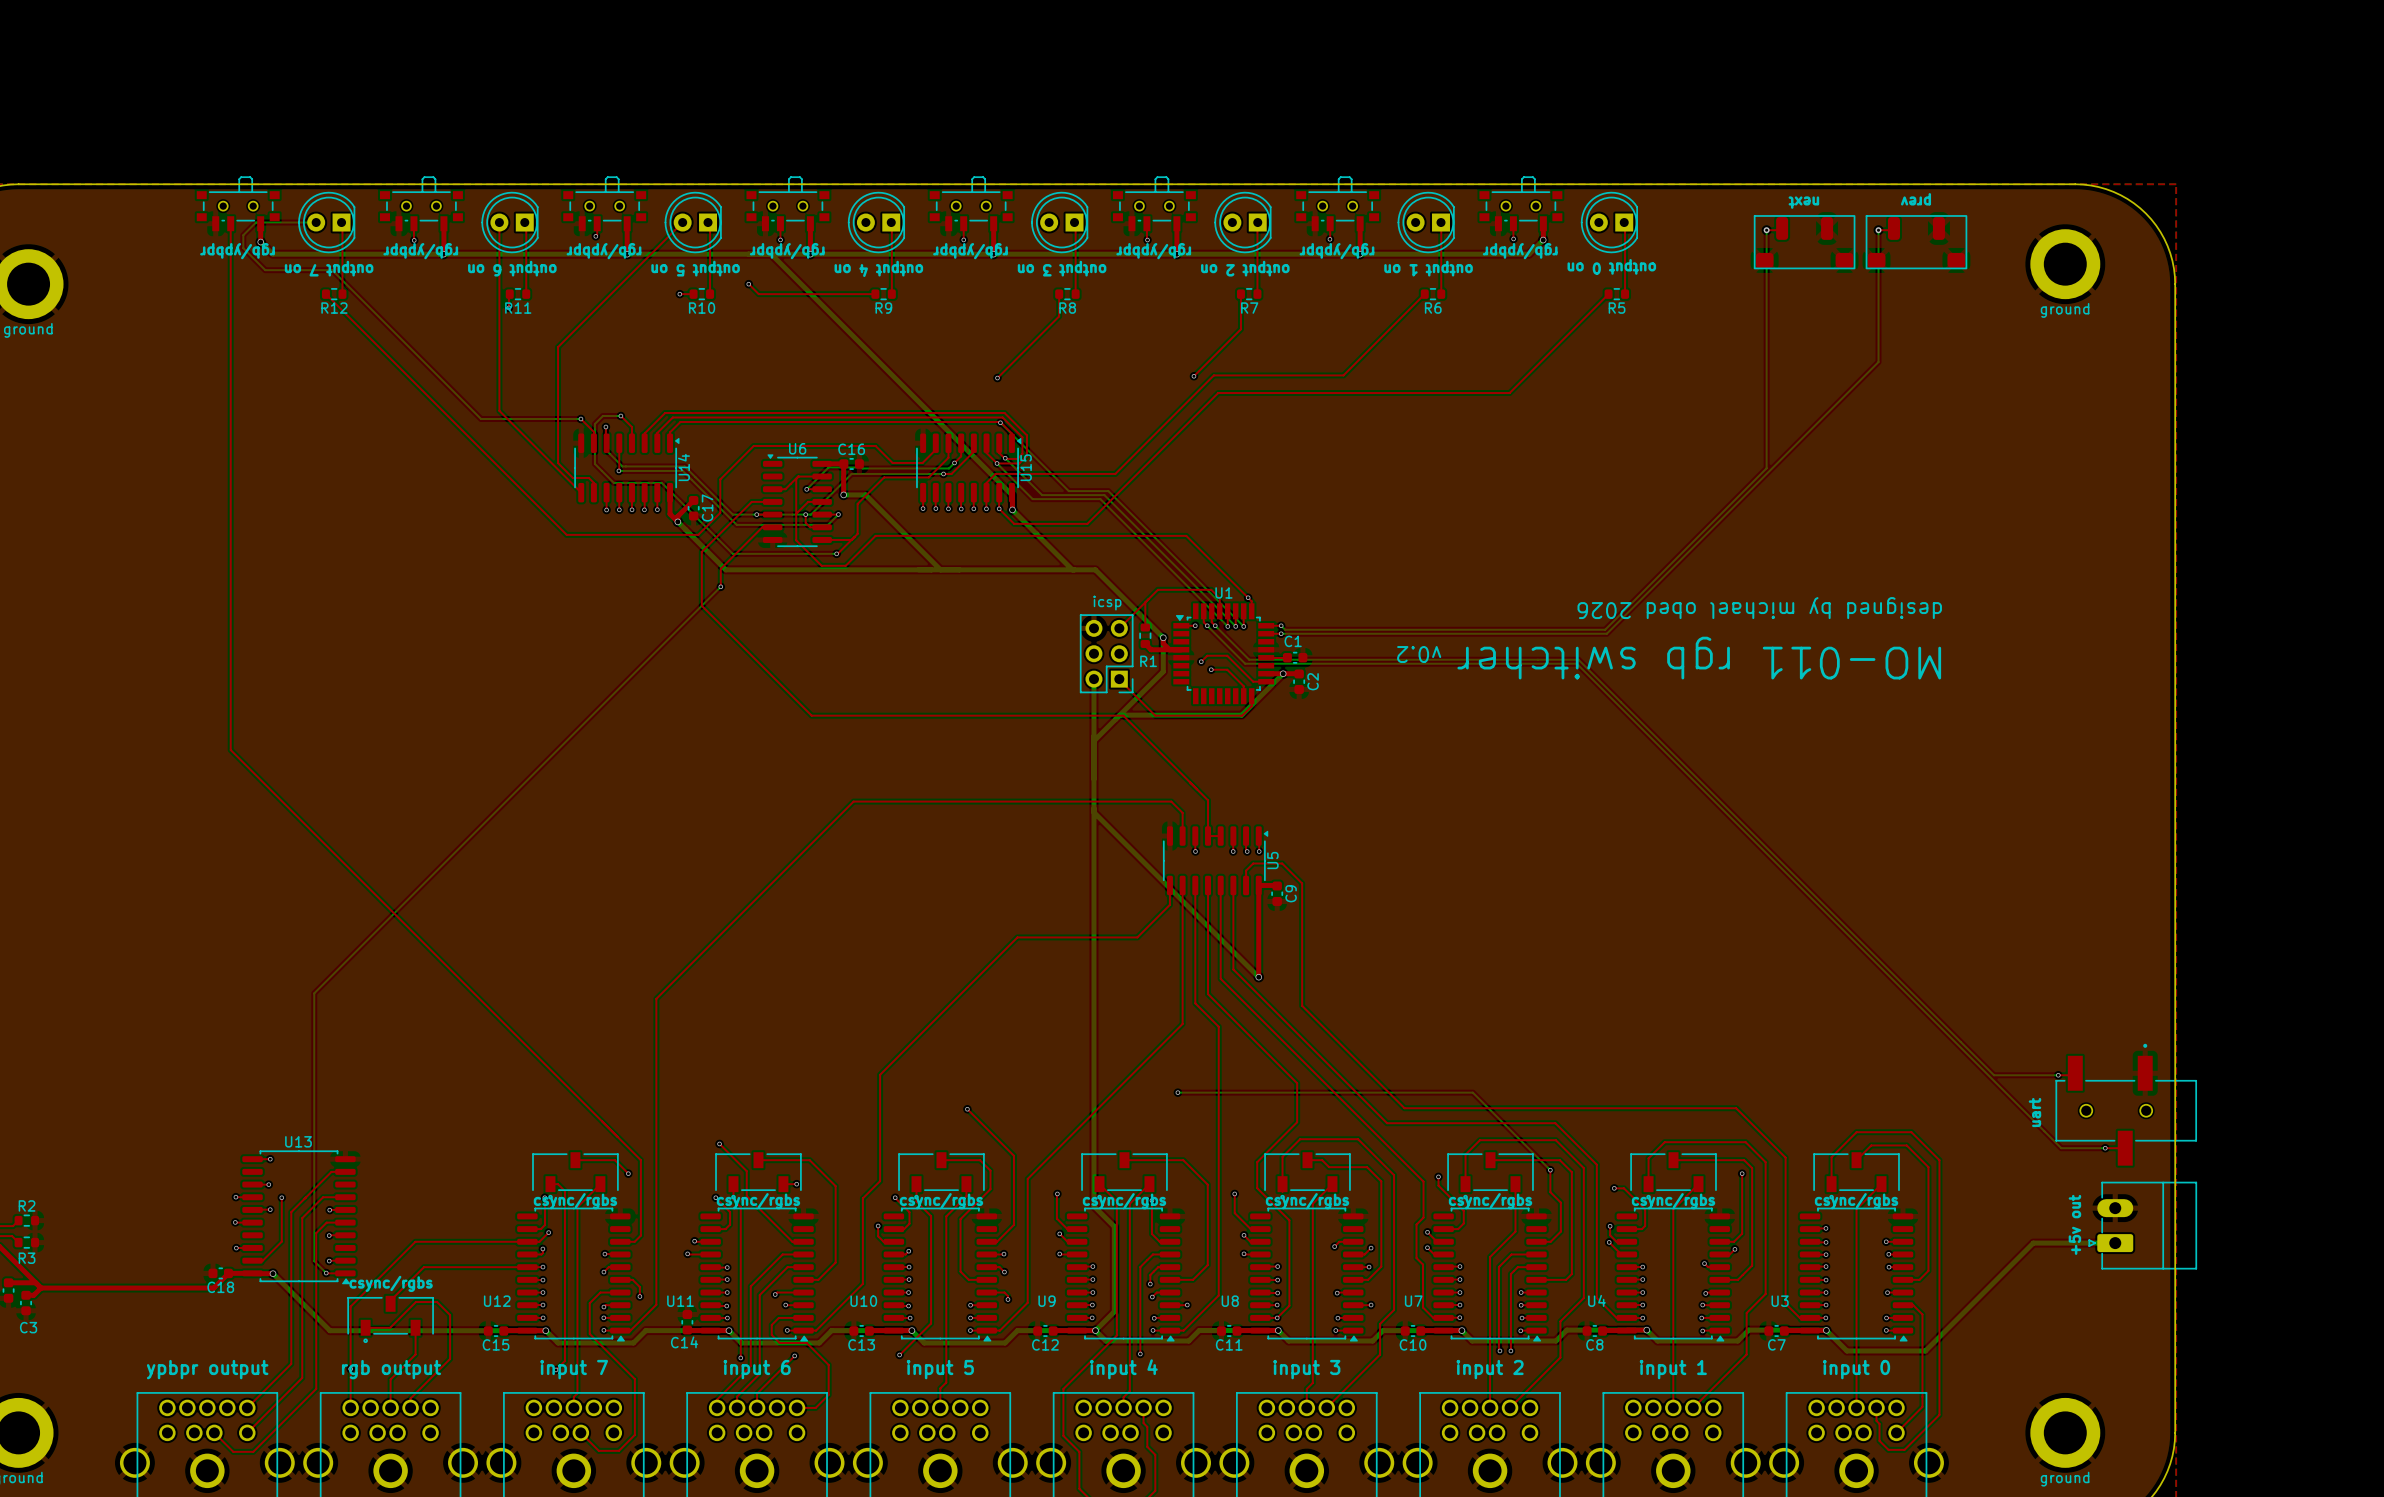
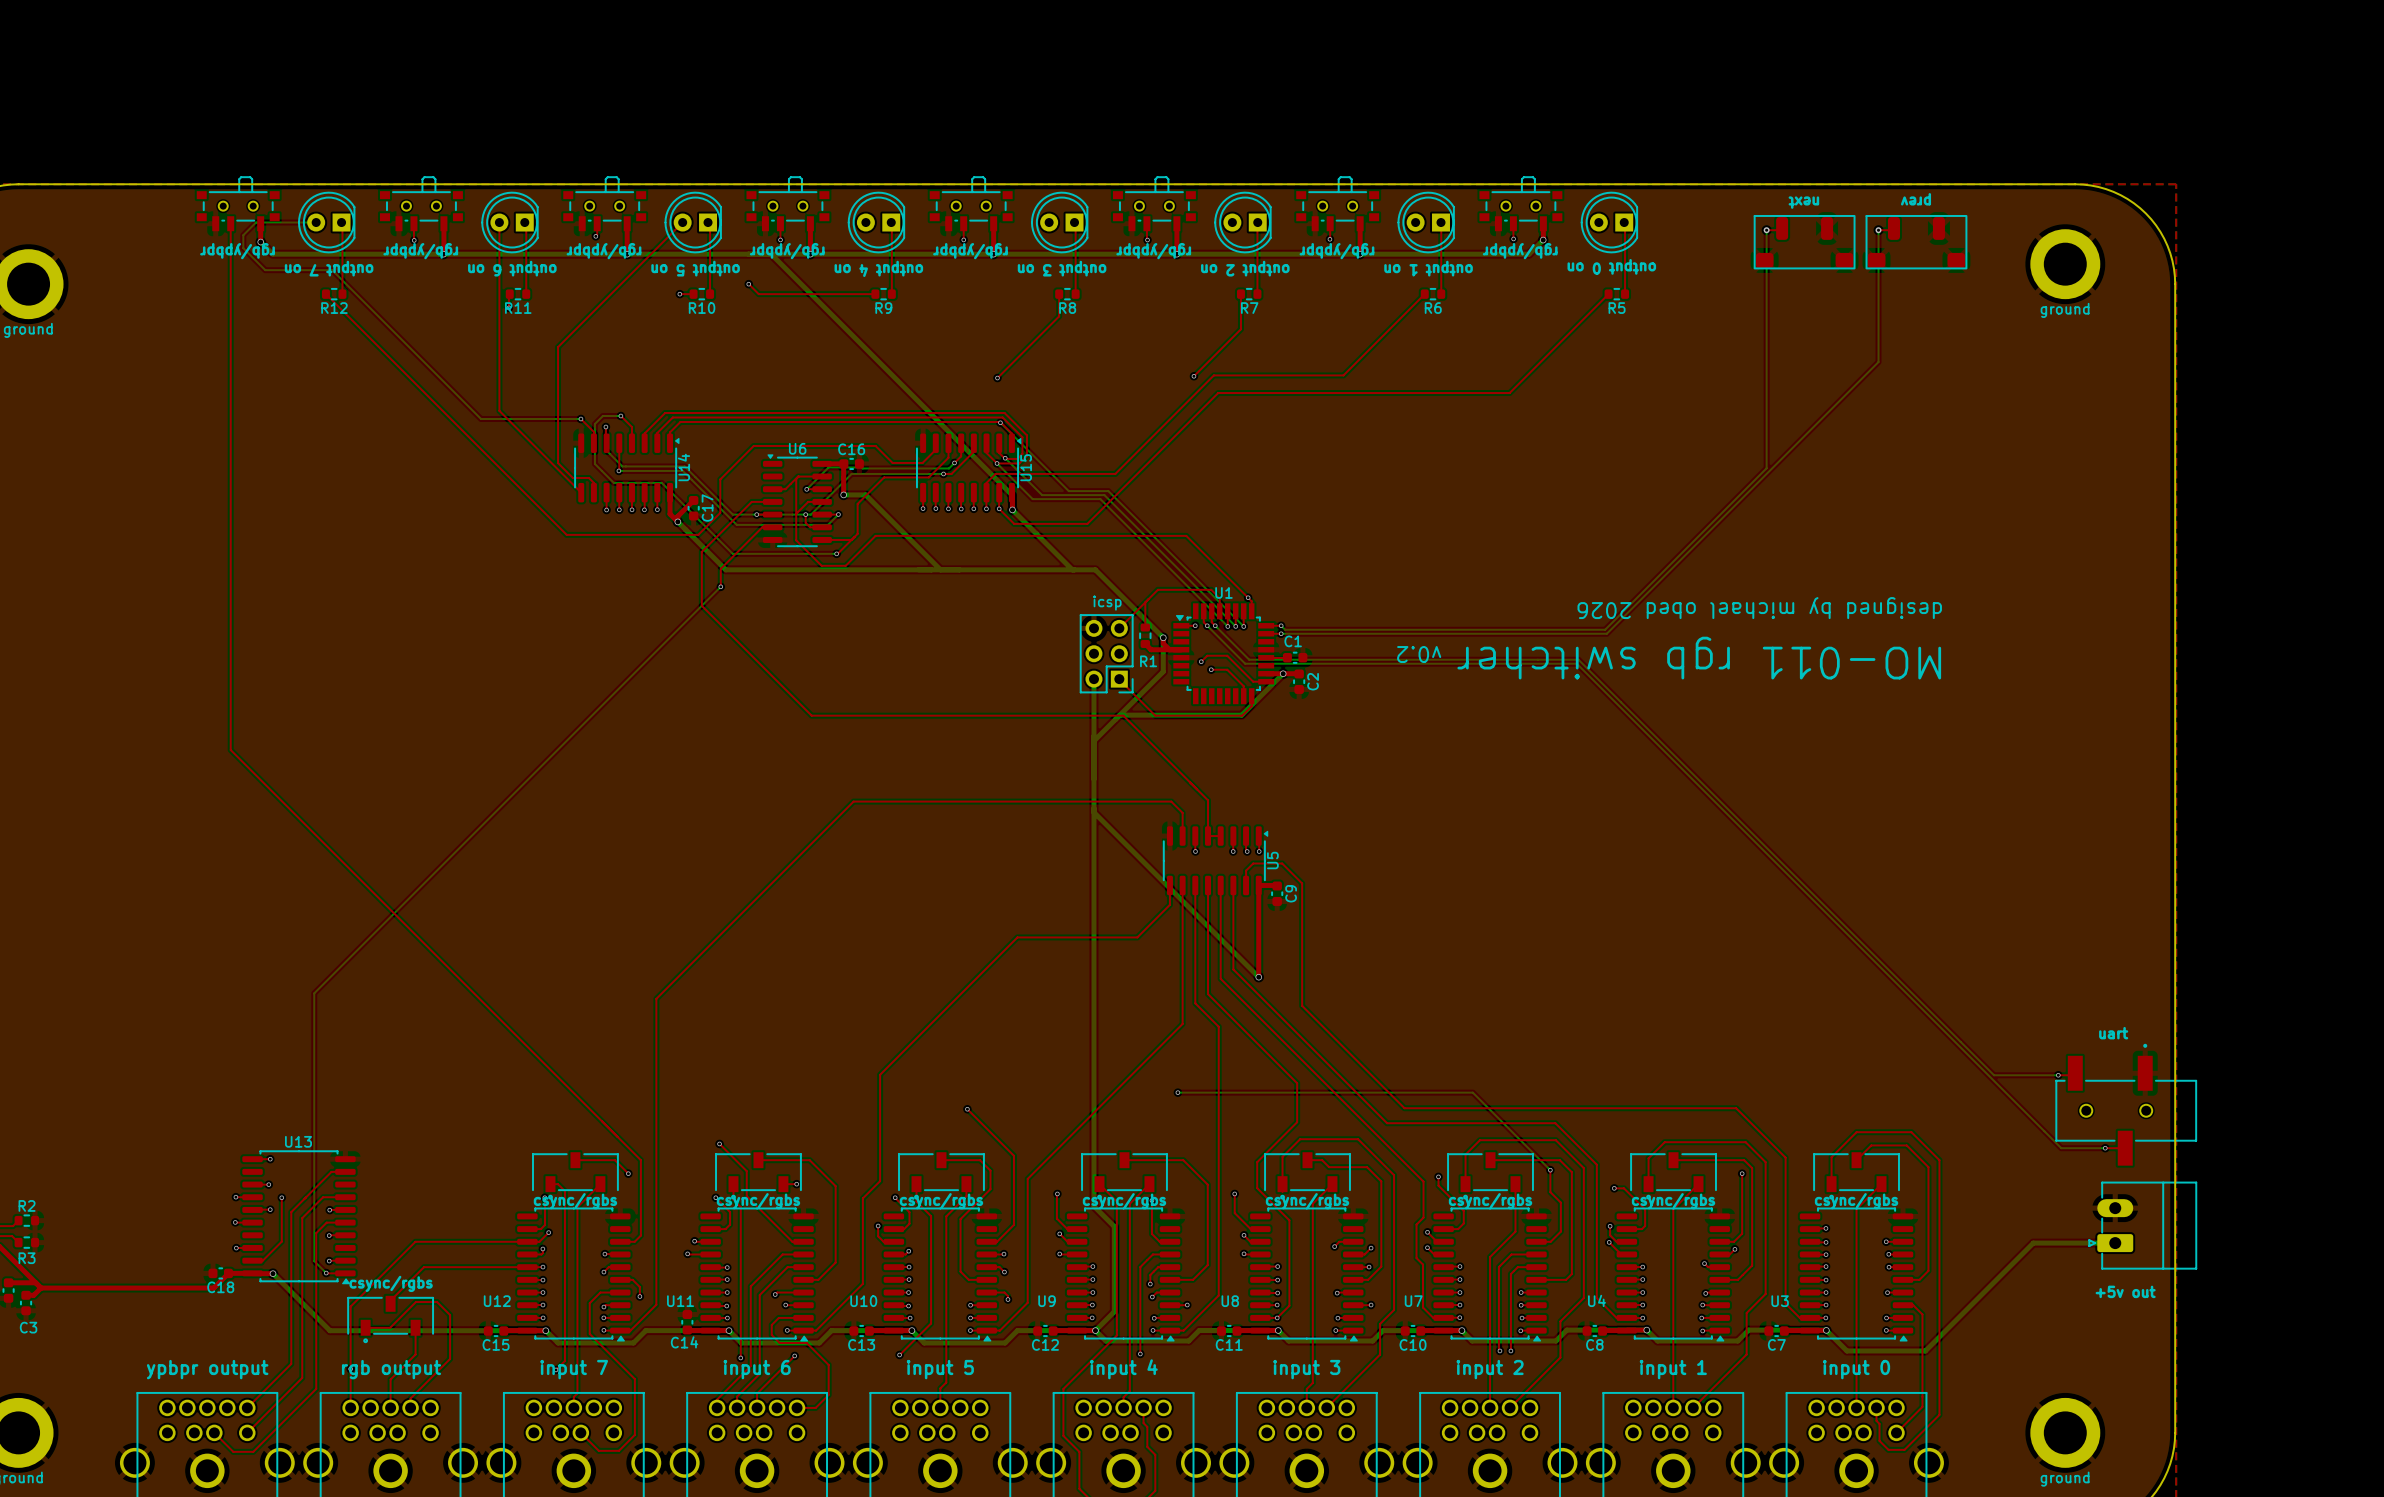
part value rotation: 0° (2034, 1112) -> 90° clockwise (2113, 1033)
part value position: uart (2034, 1112) -> uart (2113, 1033)
part value rotation: 0° (2074, 1224) -> 90° clockwise (2125, 1291)
part value position: +5v out (2074, 1224) -> +5v out (2125, 1291)

